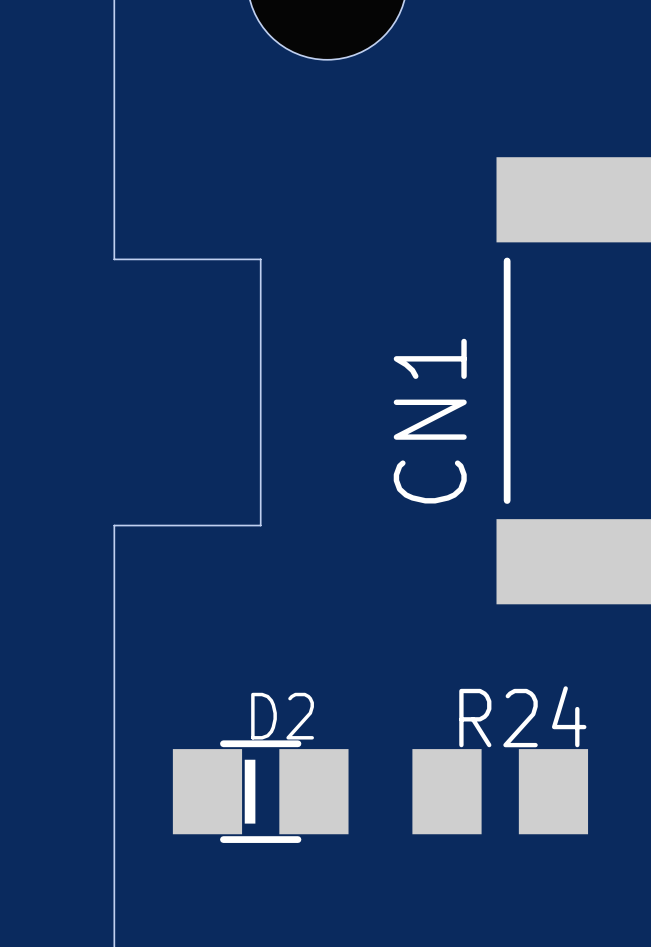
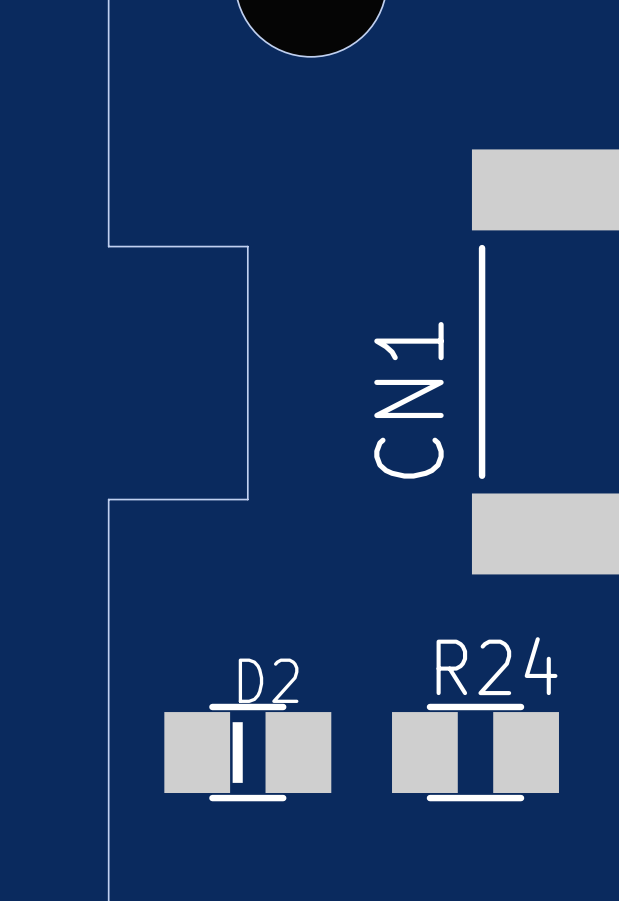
R24 footprint: [412, 749, 589, 835] -> [392, 703, 559, 802]

